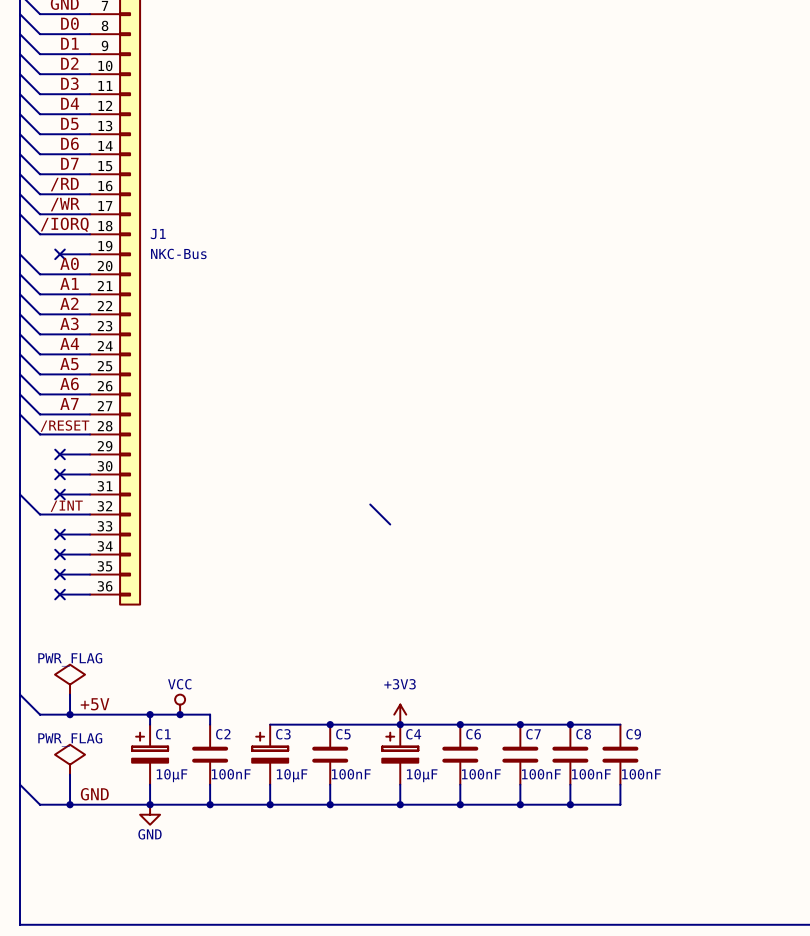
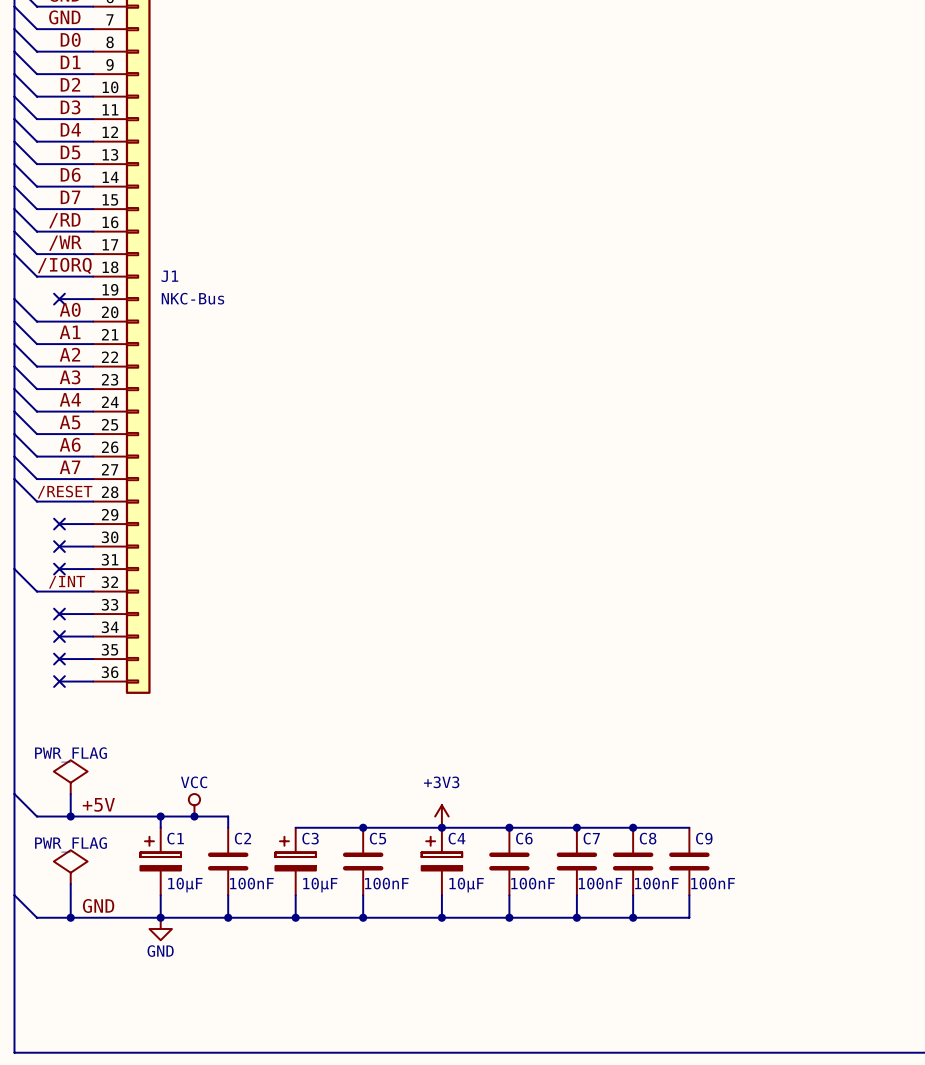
wire: (370, 504) (390, 524) -> none

